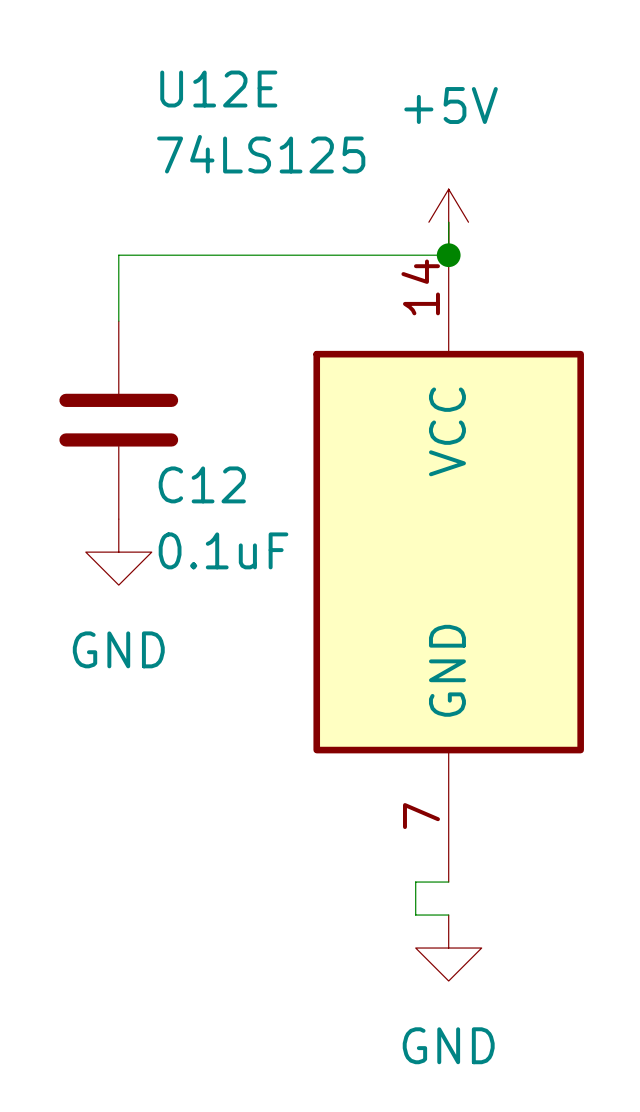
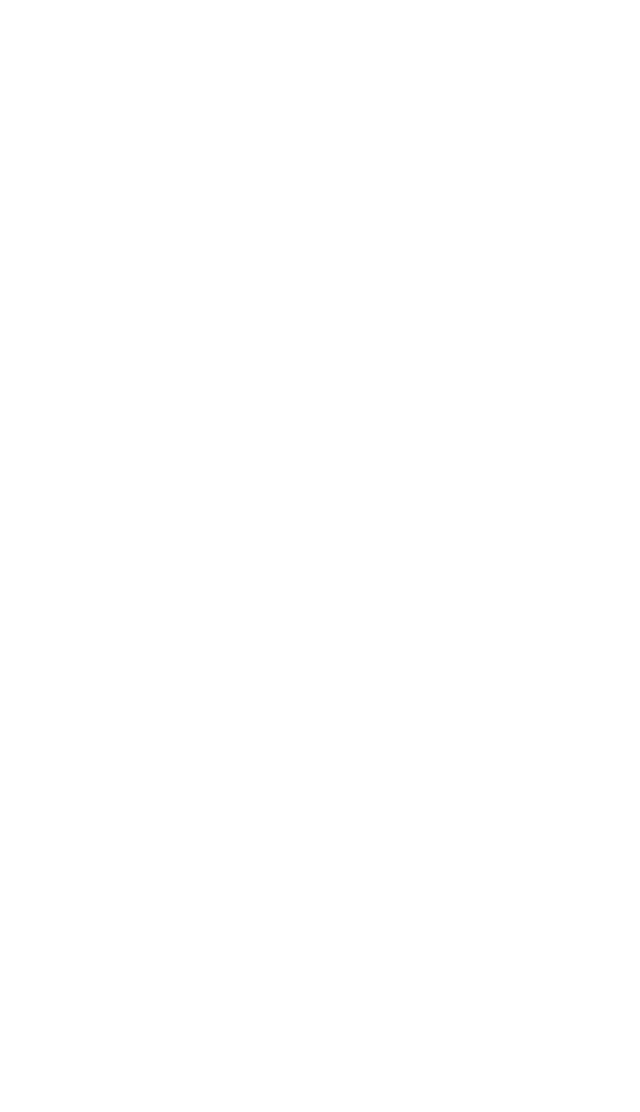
wire: (448, 222) (448, 255) (118, 255) (118, 321) -> none
power symbol: +5V (448, 222) -> none
junction: (448, 255) -> none
C12: 0.1uF (118, 420) -> none
power symbol: GND (118, 552) -> none
U12E: 74LS125 (448, 552) -> none
wire: (448, 882) (415, 882) (415, 915) (448, 915) -> none
power symbol: GND (448, 948) -> none

